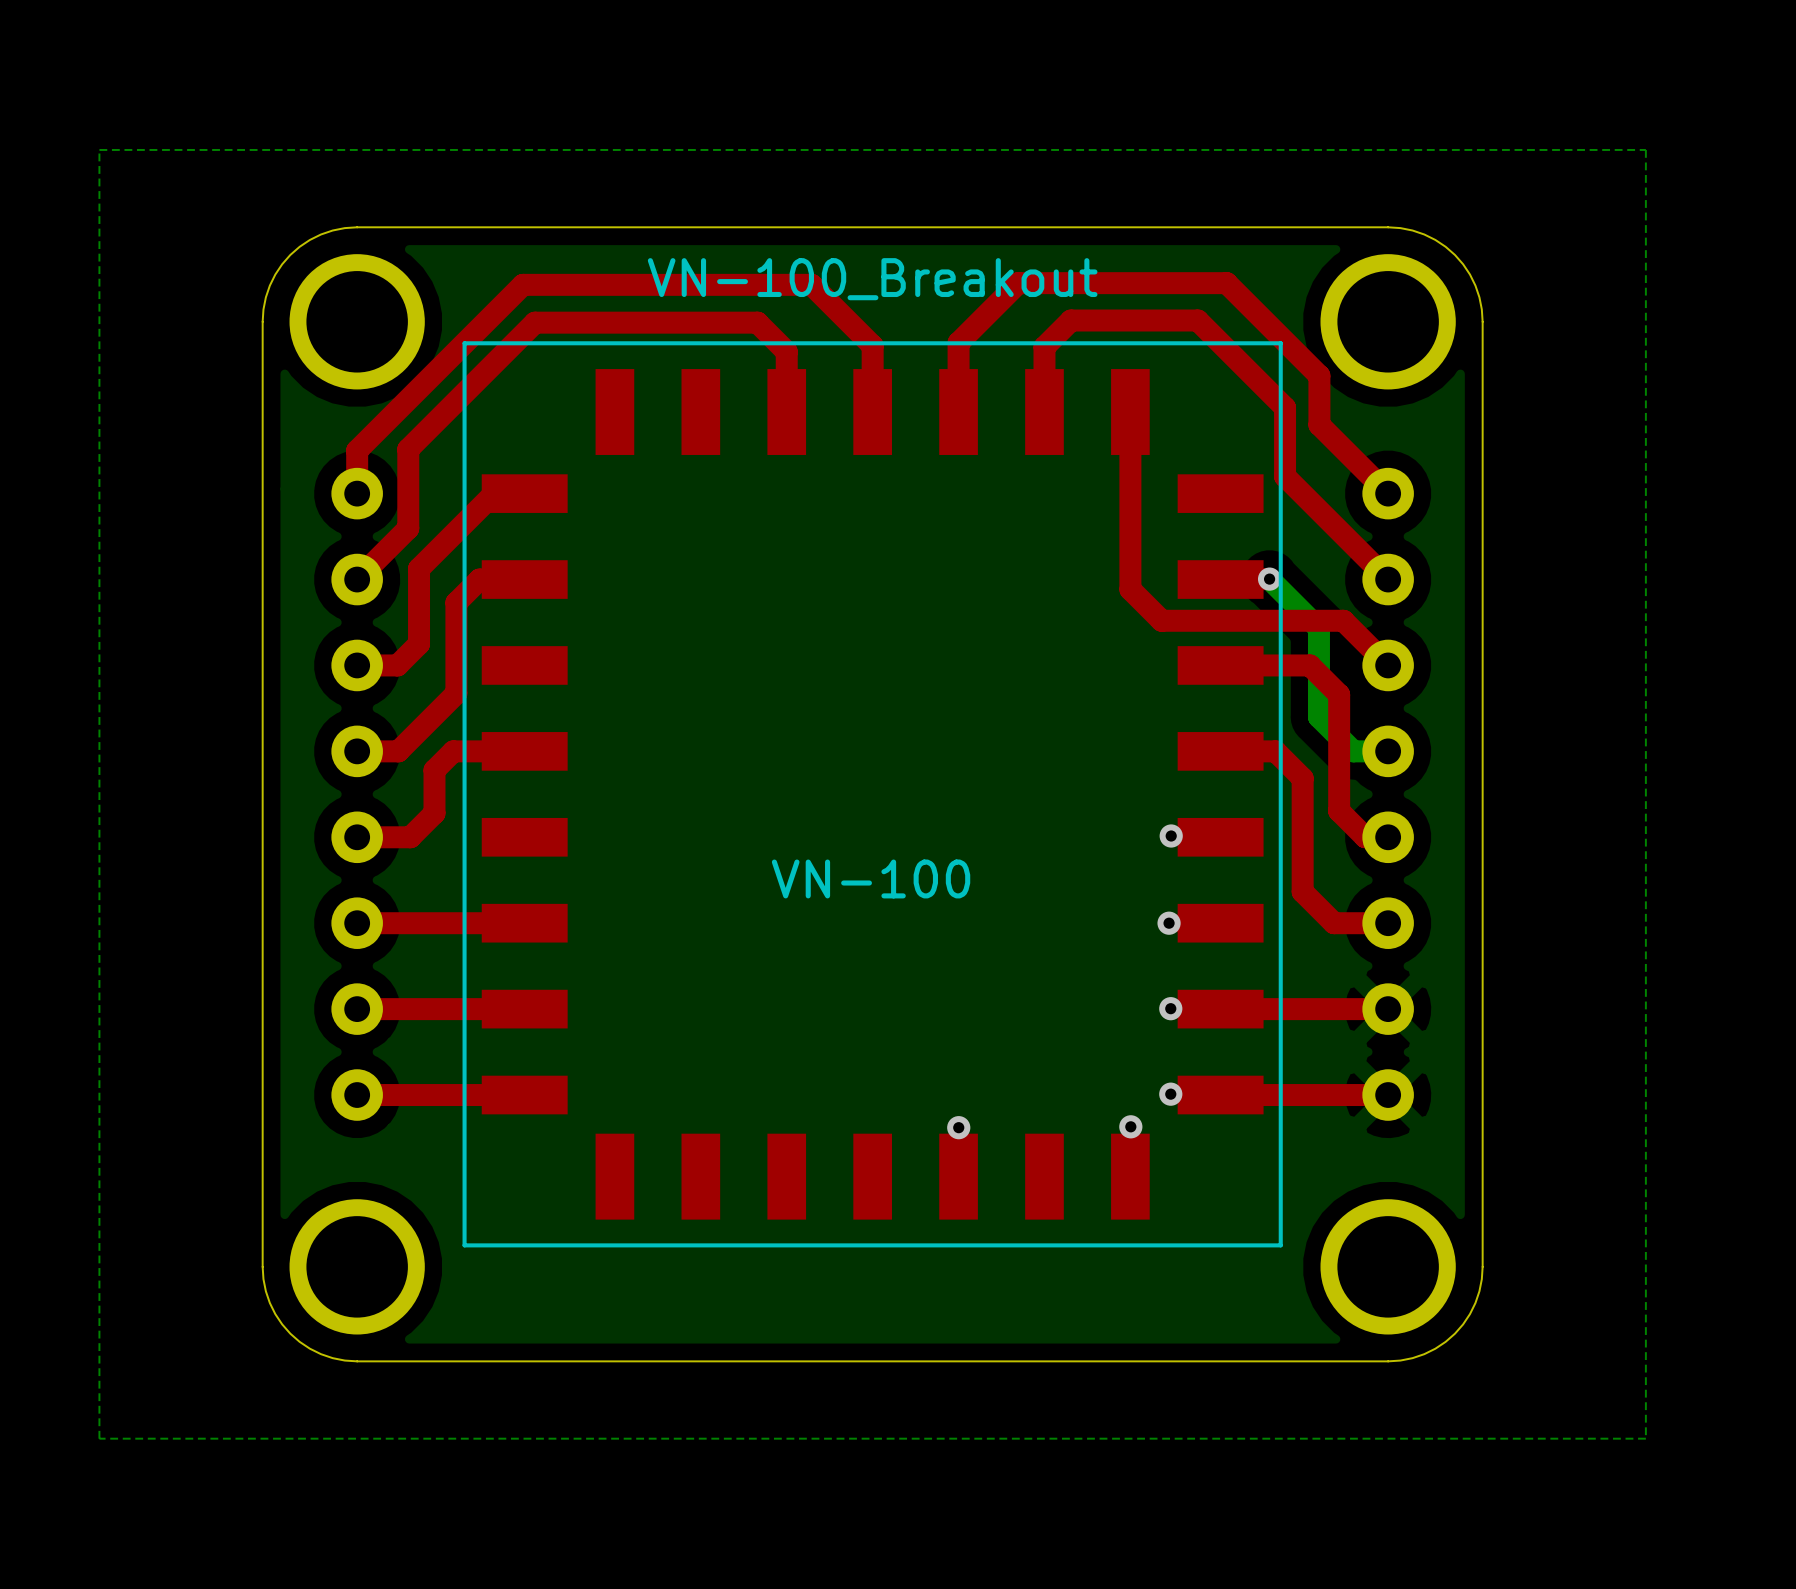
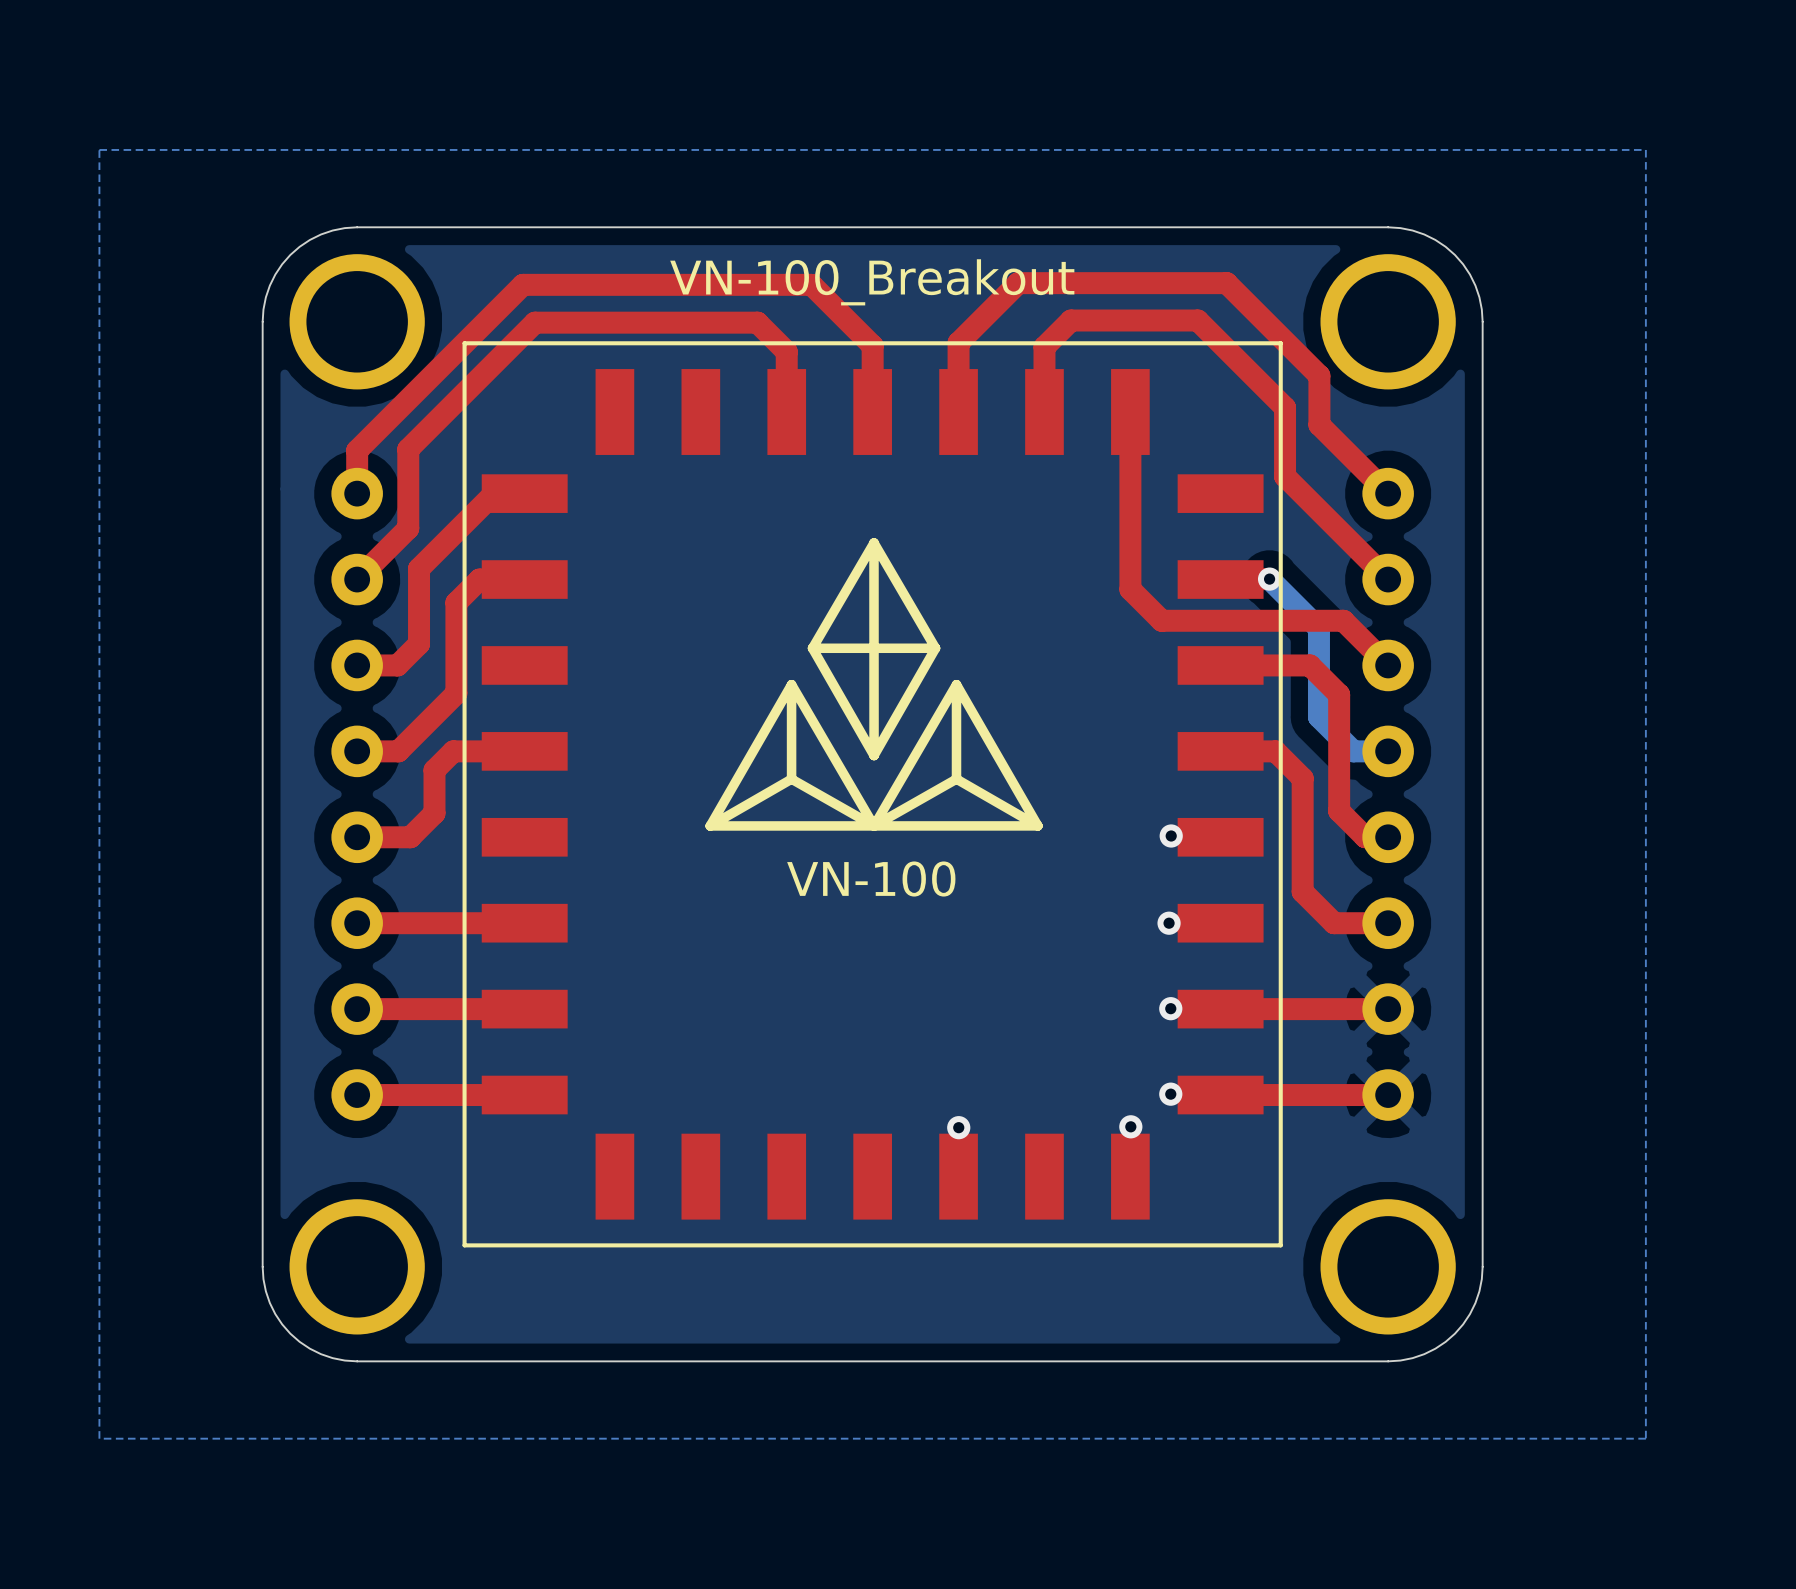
line: none -> (873, 542) (935, 648)
line: none -> (873, 542) (874, 755)
line: none -> (874, 542) (812, 648)
line: none -> (812, 648) (874, 755)
line: none -> (812, 648) (935, 648)
line: none -> (935, 648) (874, 755)
line: none -> (791, 684) (710, 825)
line: none -> (791, 684) (874, 825)
line: none -> (791, 684) (791, 779)
line: none -> (956, 684) (874, 825)
line: none -> (956, 684) (1037, 825)
line: none -> (956, 684) (956, 779)
line: none -> (791, 779) (710, 825)
line: none -> (791, 779) (874, 825)
line: none -> (956, 779) (874, 825)
line: none -> (956, 779) (1037, 825)
line: none -> (1037, 825) (710, 825)

